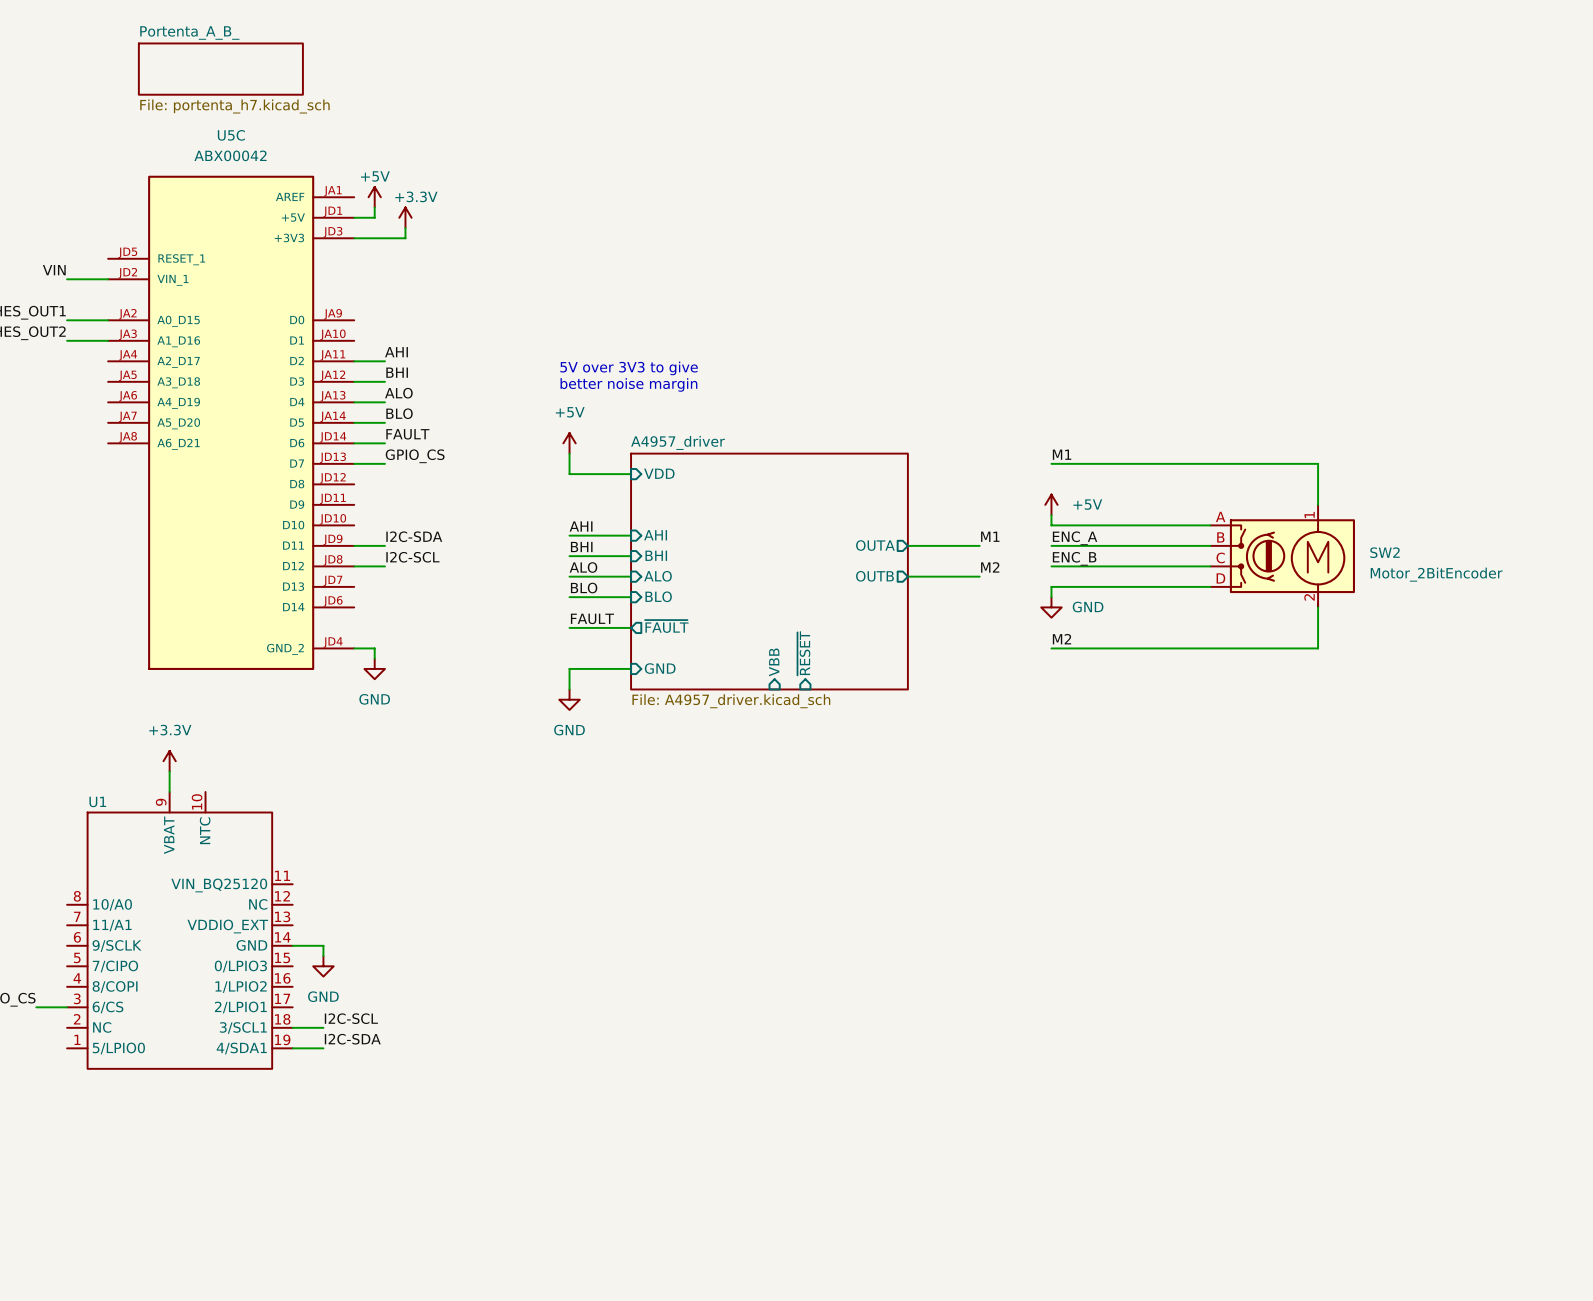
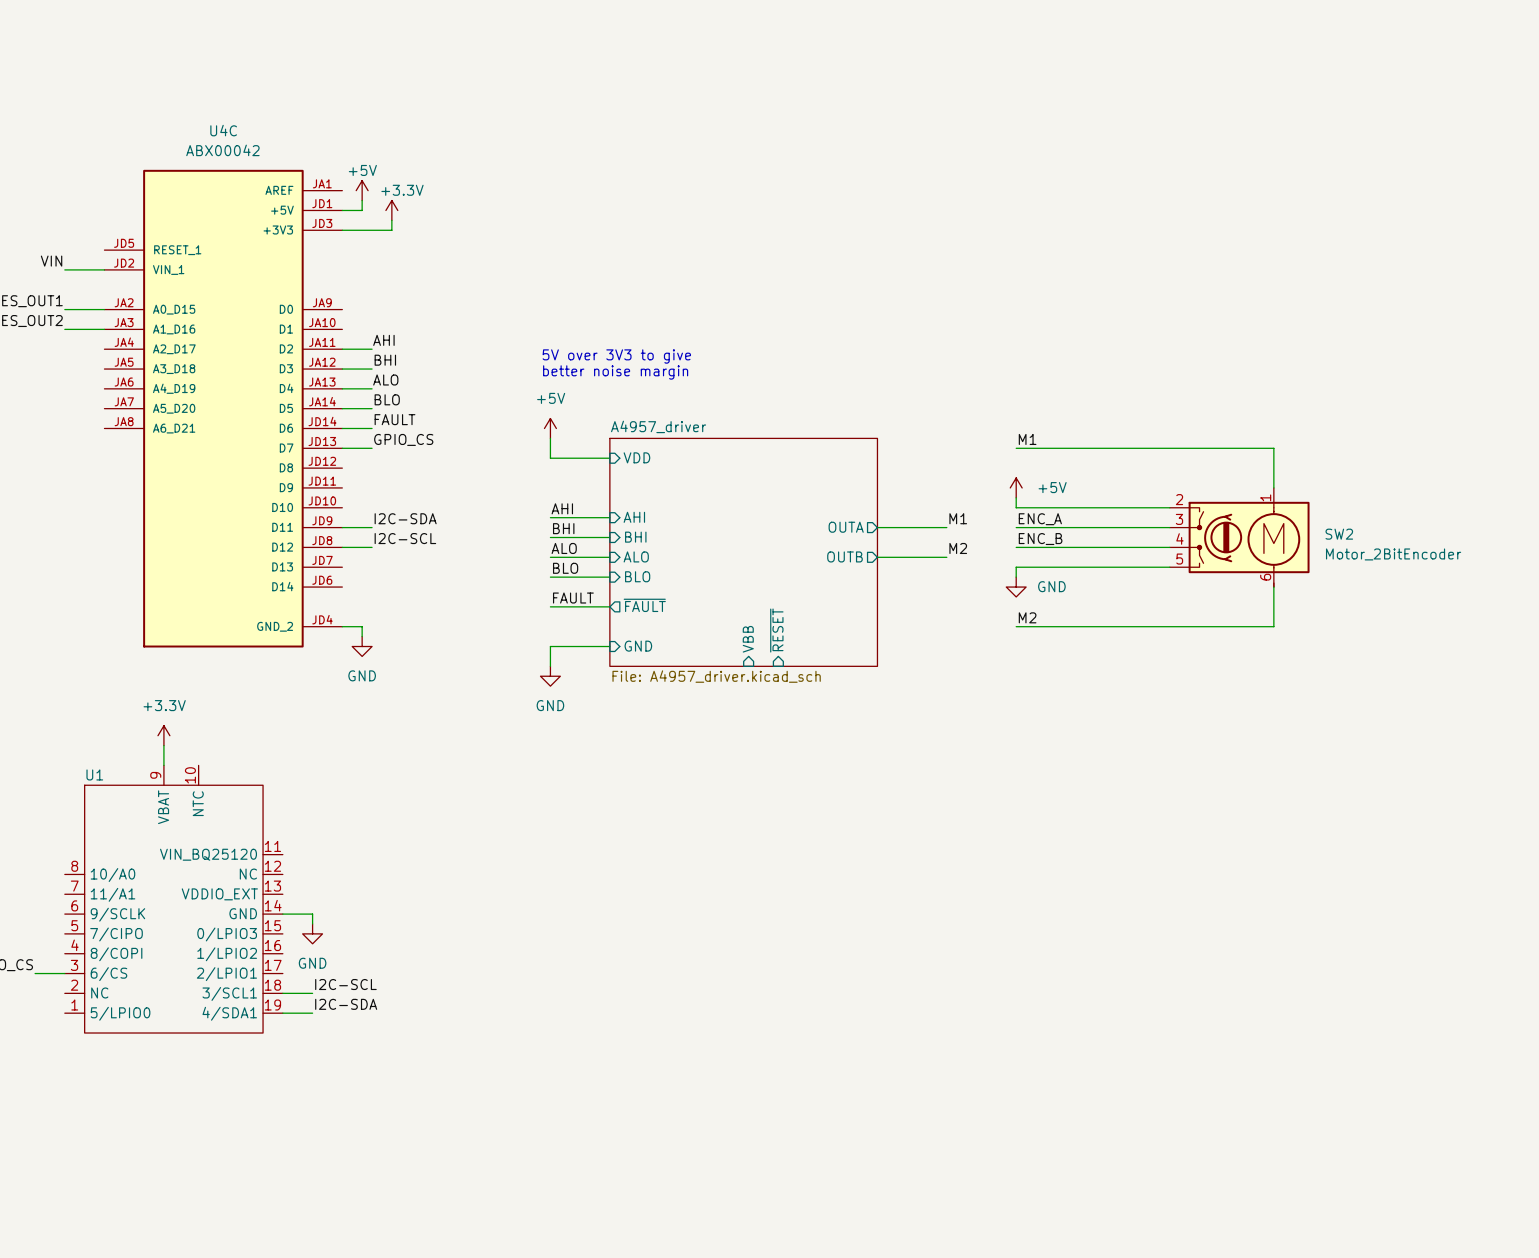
sheet Portenta_A_B_: File: portenta_h7.kicad_sch (220, 69) -> none
U5C name: U5C (231, 135) -> U4C (223, 130)
SW2 pin number: A (1220, 516) -> 2 (1179, 499)
SW2 pin number: B (1220, 537) -> 3 (1179, 519)
SW2 pin number: C (1220, 557) -> 4 (1179, 539)
SW2 pin number: D (1220, 578) -> 5 (1179, 559)
SW2 pin number: 2 (1309, 597) -> 6 (1265, 577)

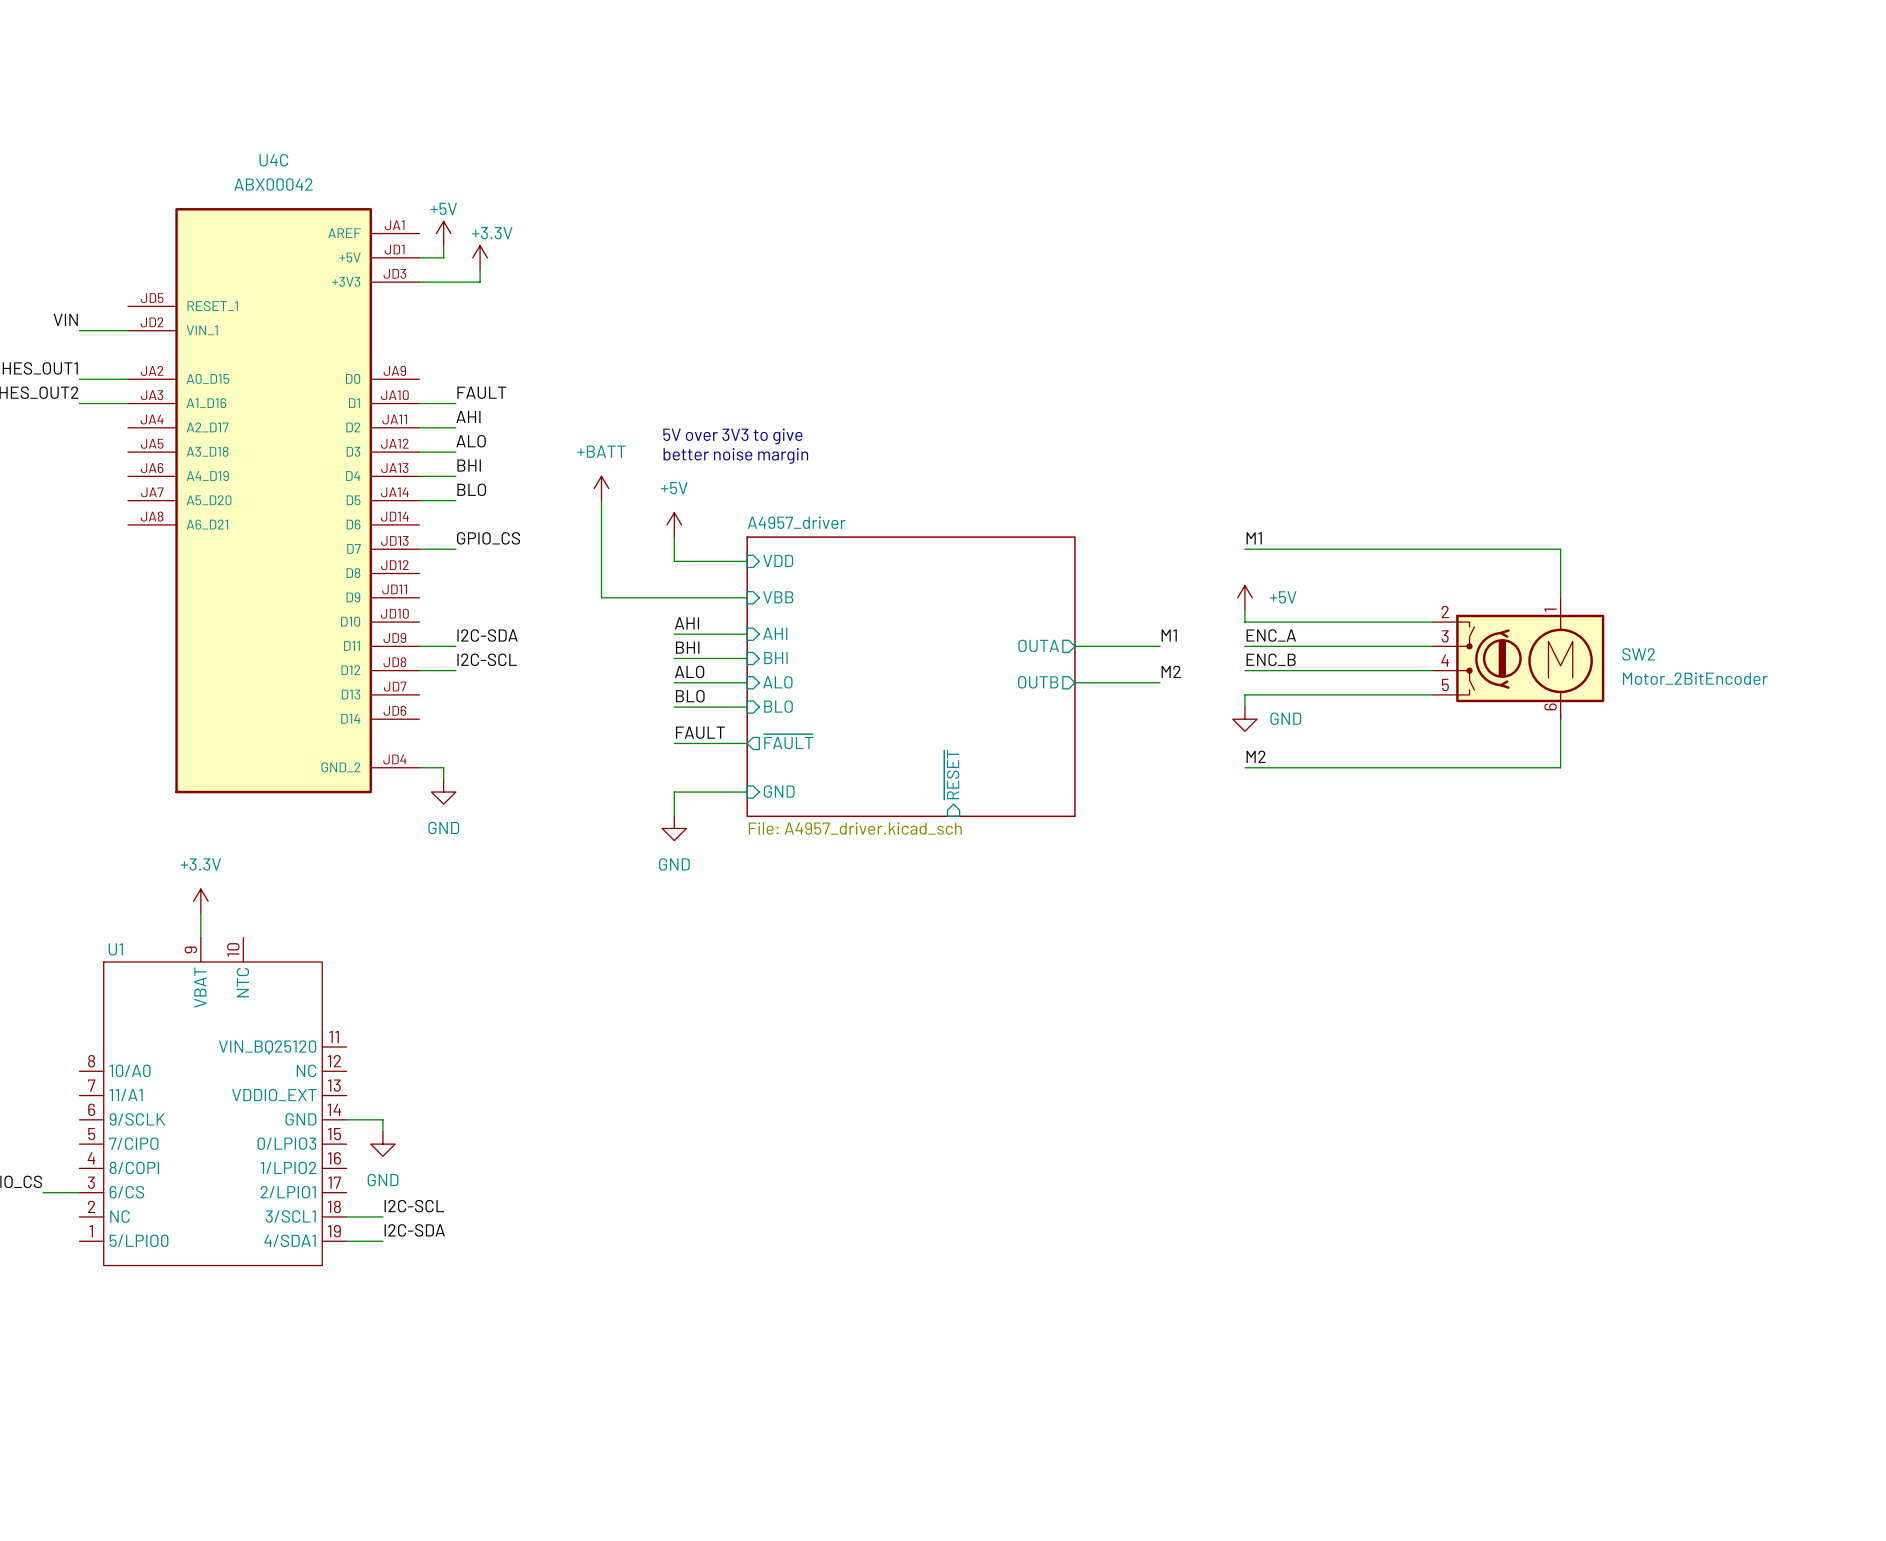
label: BHI (385, 360) -> ALO (471, 441)
label: ALO (385, 380) -> BHI (469, 465)
power symbol: none -> +BATT (601, 488)
wire: none -> (601, 500) (601, 597) (747, 597)
label position: FAULT (395, 419) -> FAULT (481, 392)
wire: (342, 428) (372, 428) -> (419, 403) (455, 403)
sheet pin: none -> VBB (778, 597)
sheet pin: VBB (748, 639) -> none

